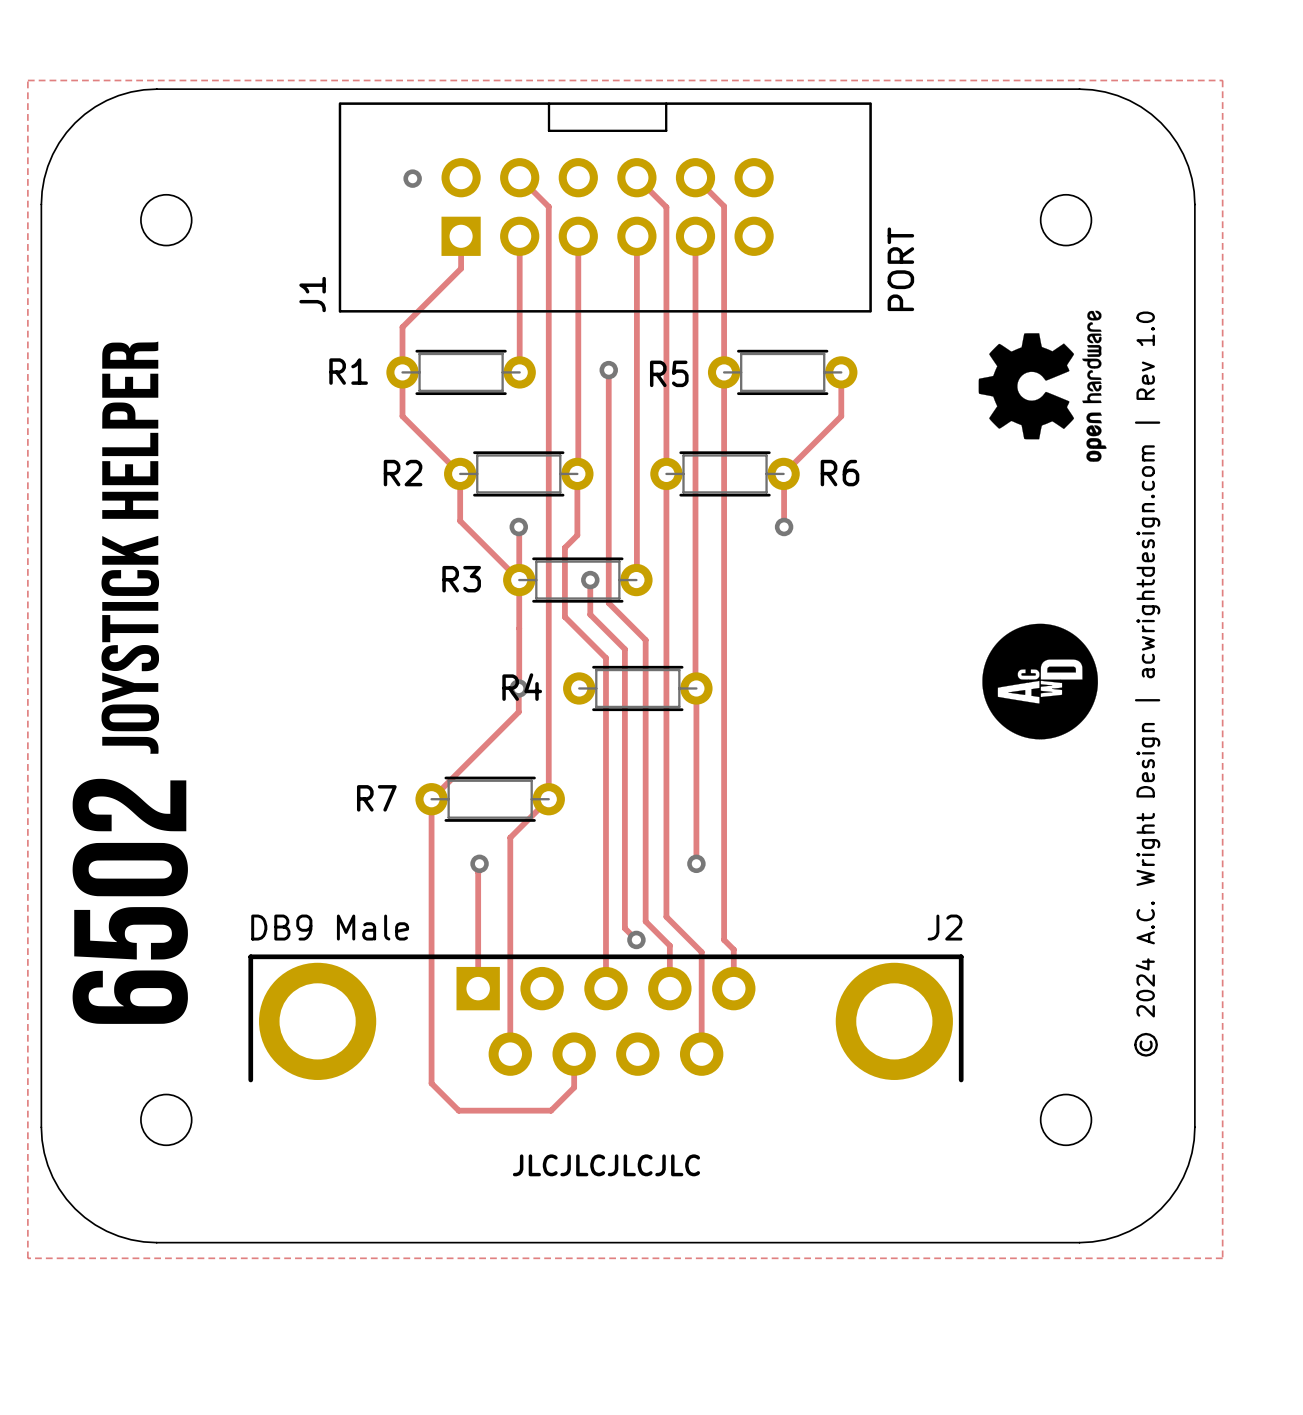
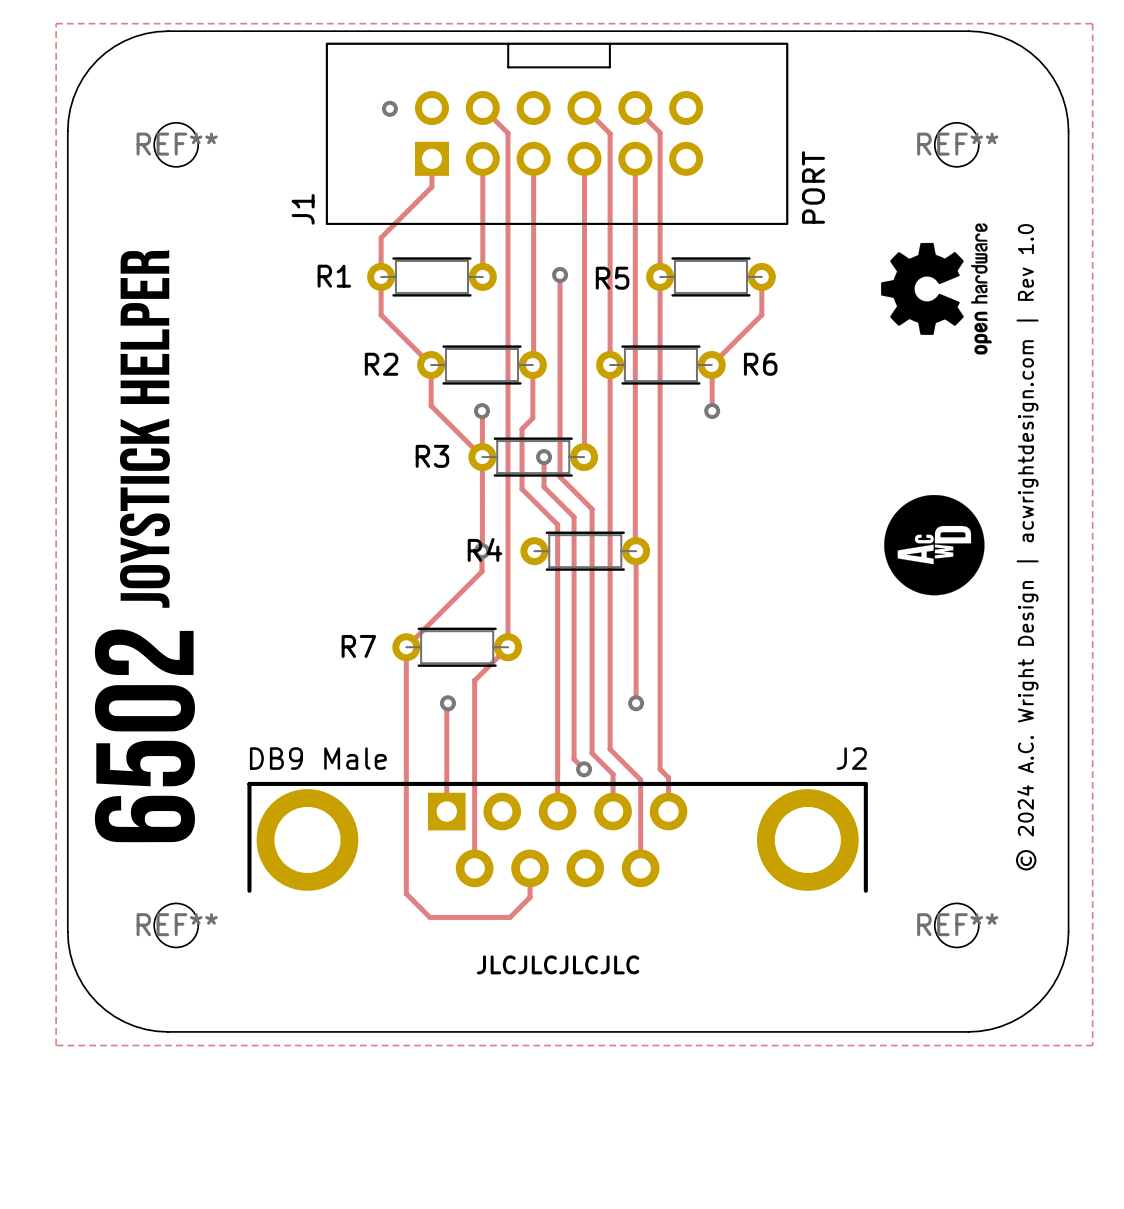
REF** name: none -> REF** (177, 144)
REF** name: none -> REF** (957, 144)
REF** name: none -> REF** (177, 924)
REF** name: none -> REF** (957, 924)

